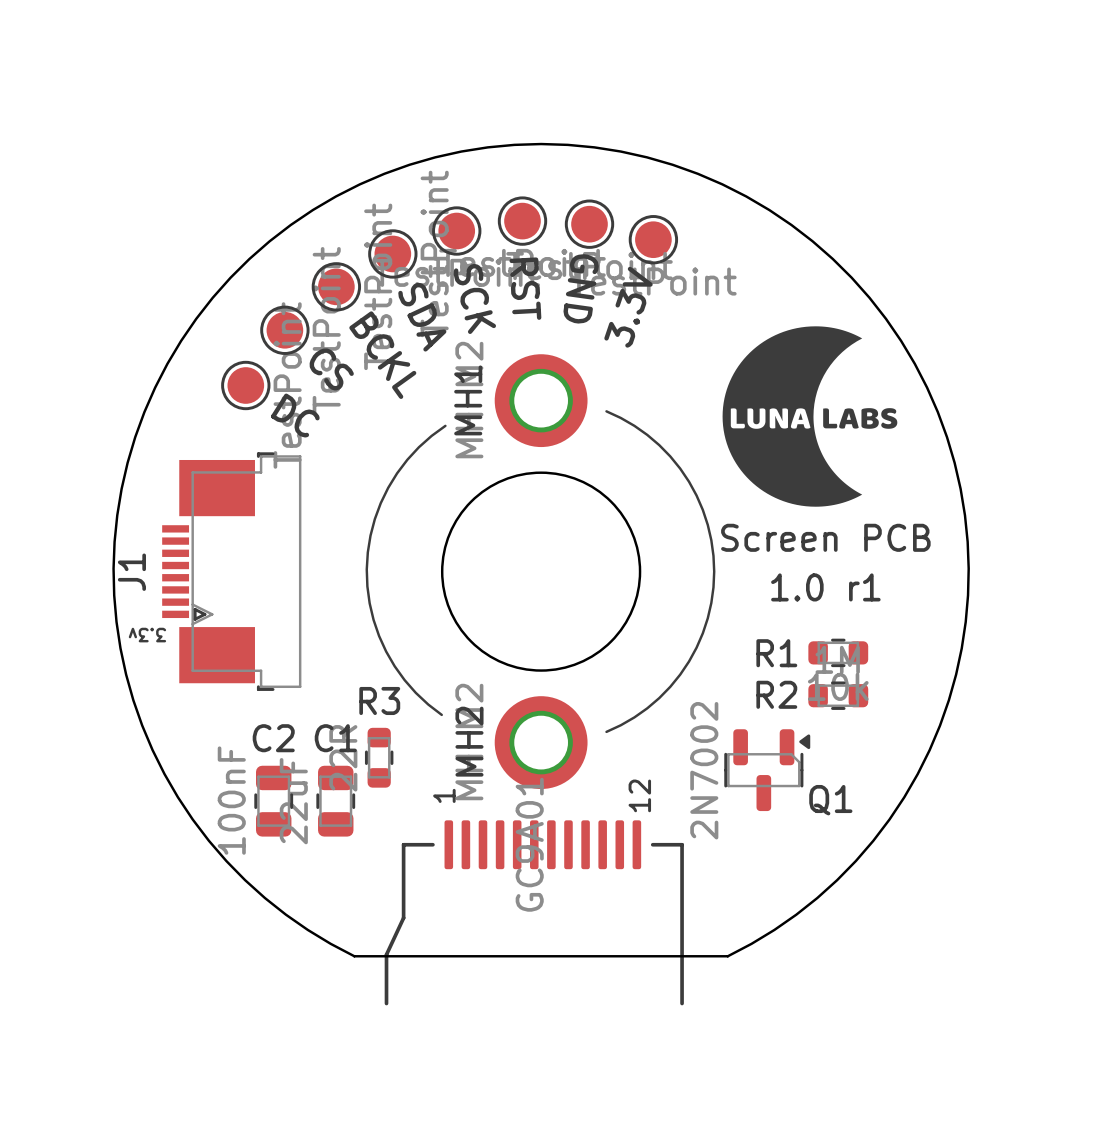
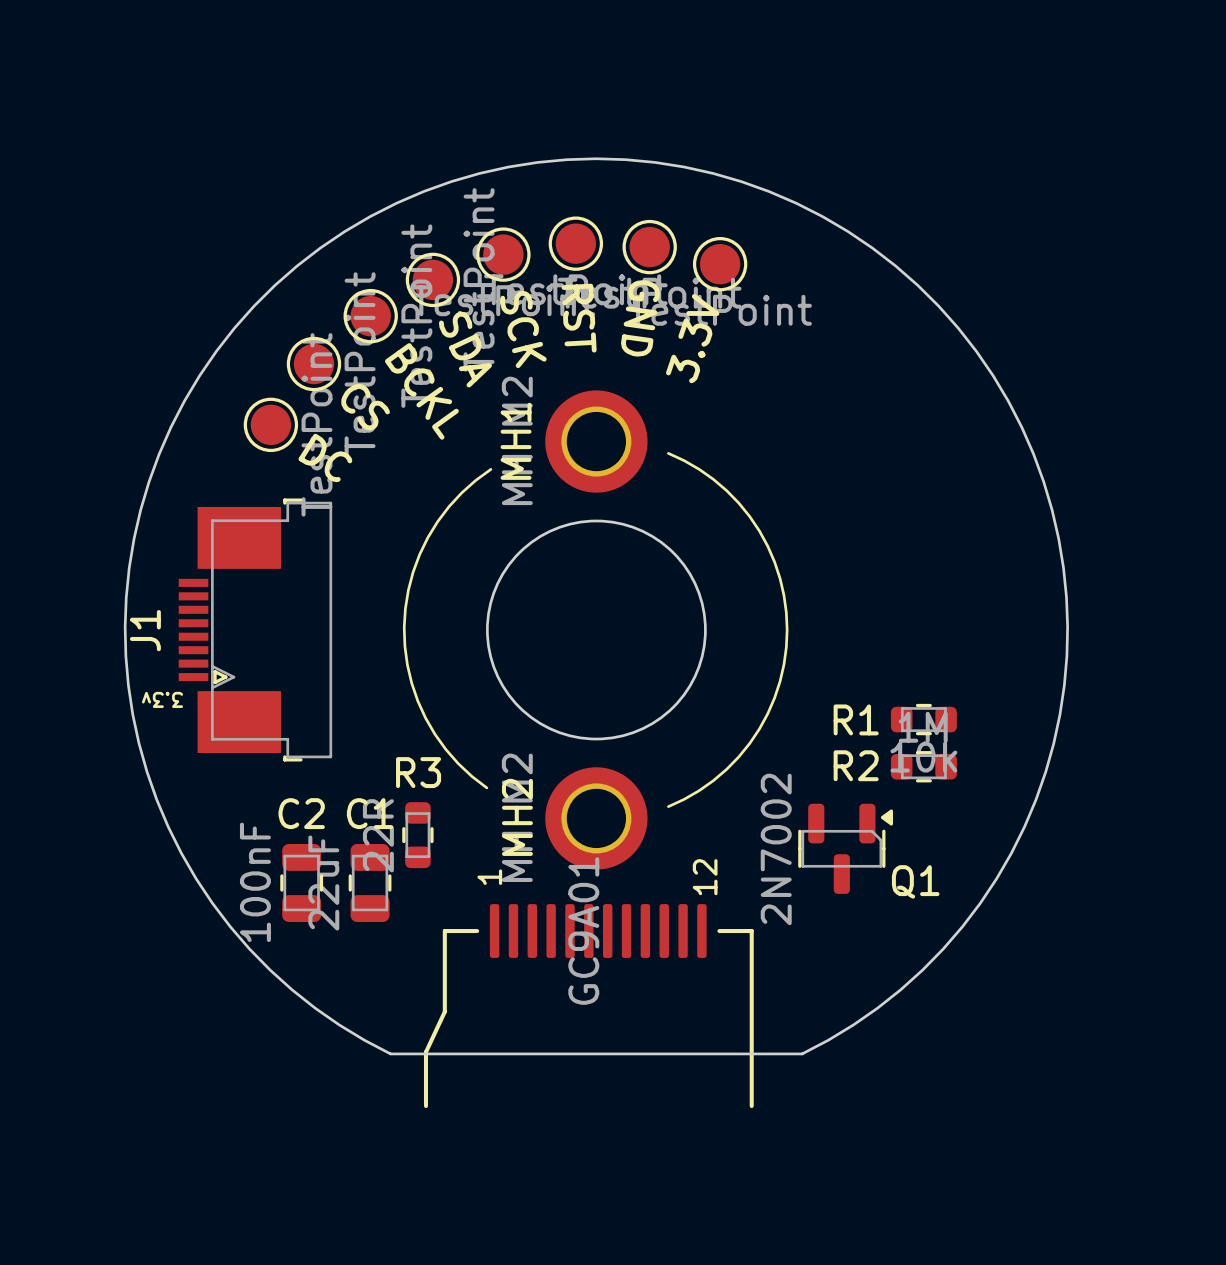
drawing: [722, 326, 898, 507] -> none
text: Screen PCB (825, 537) -> none
text: 1.0 r1 (825, 587) -> none

